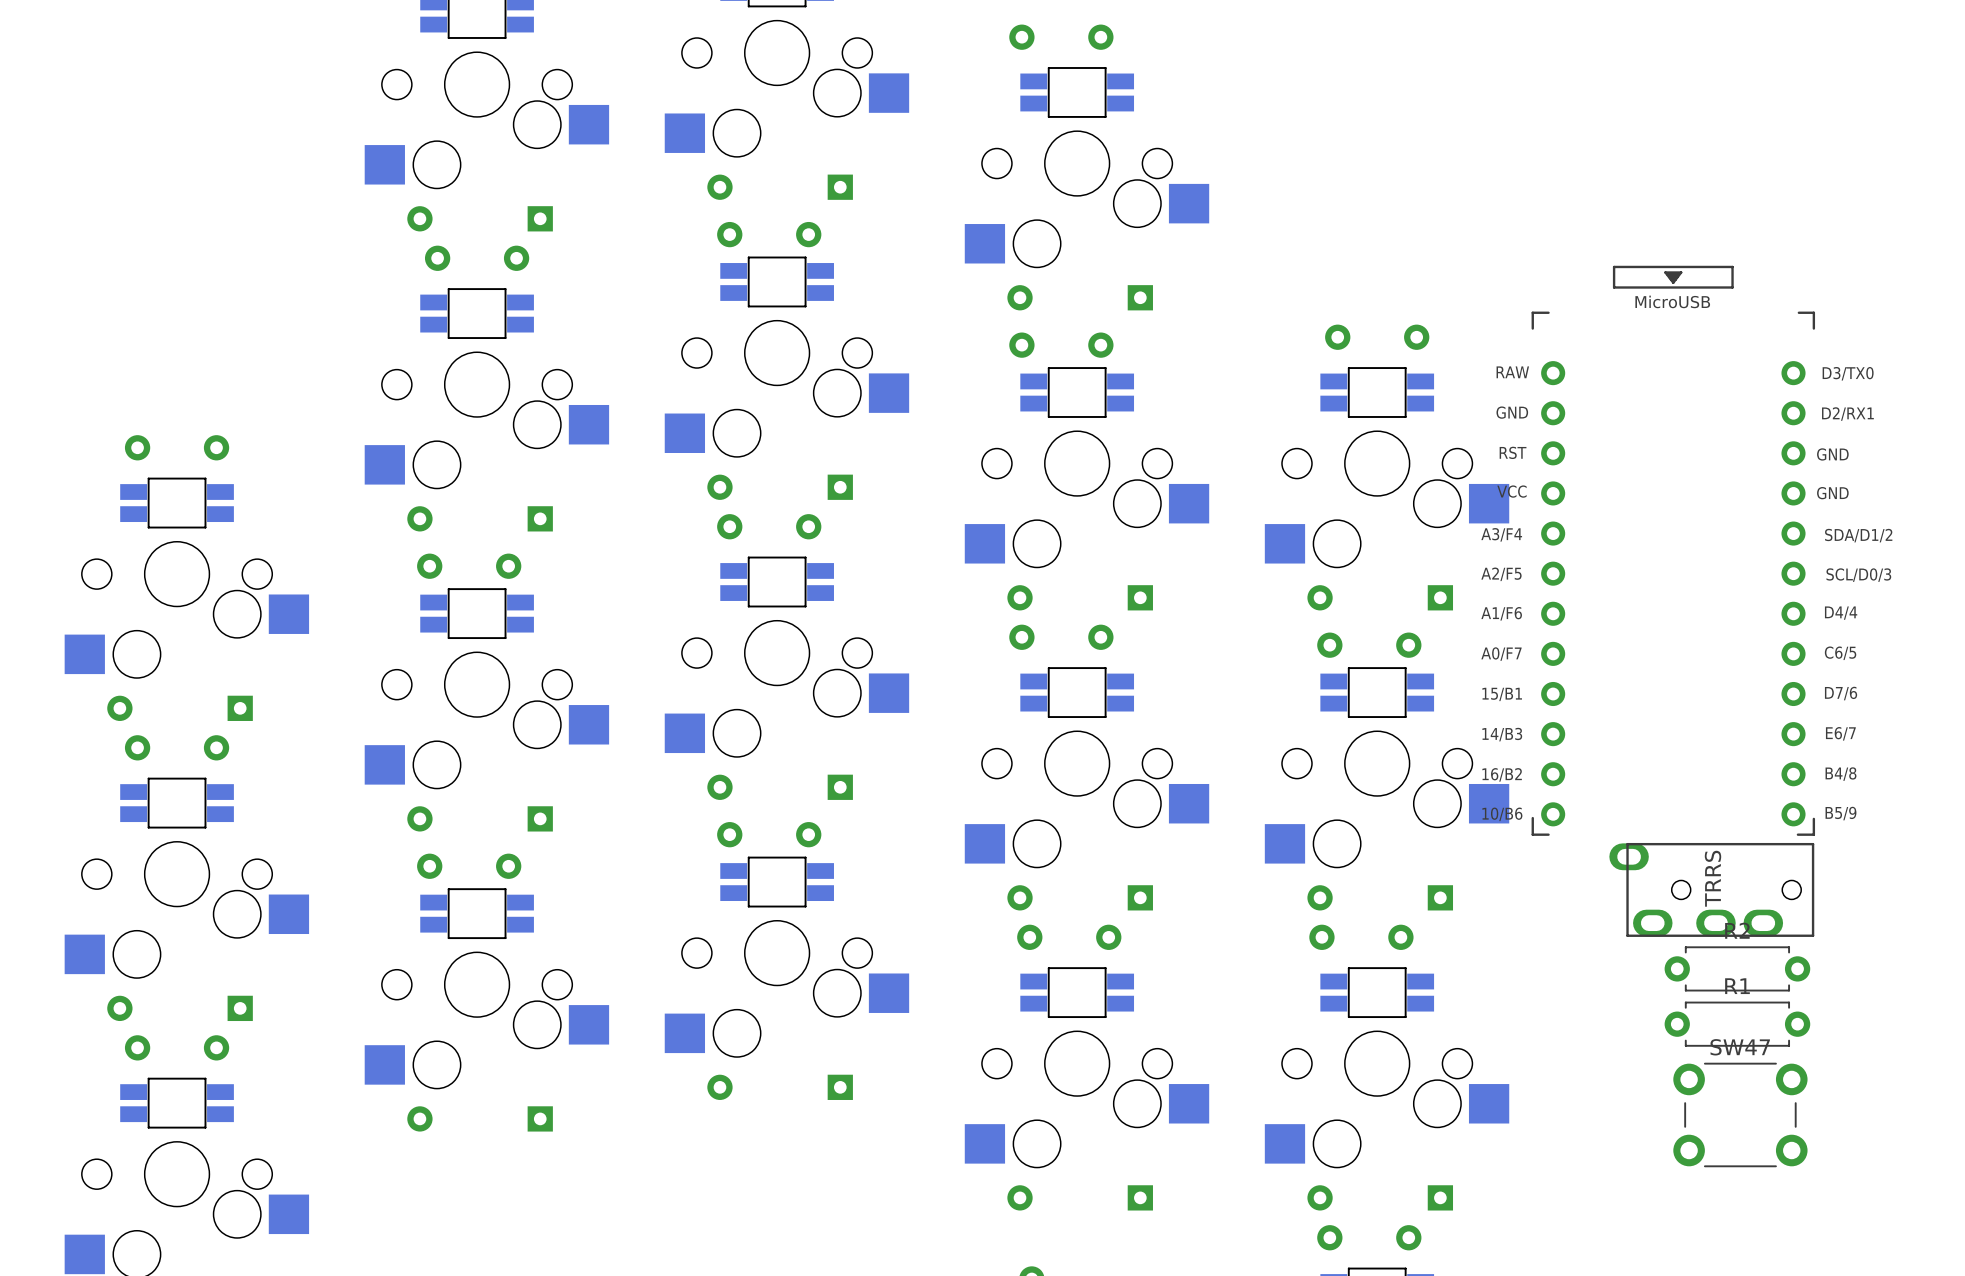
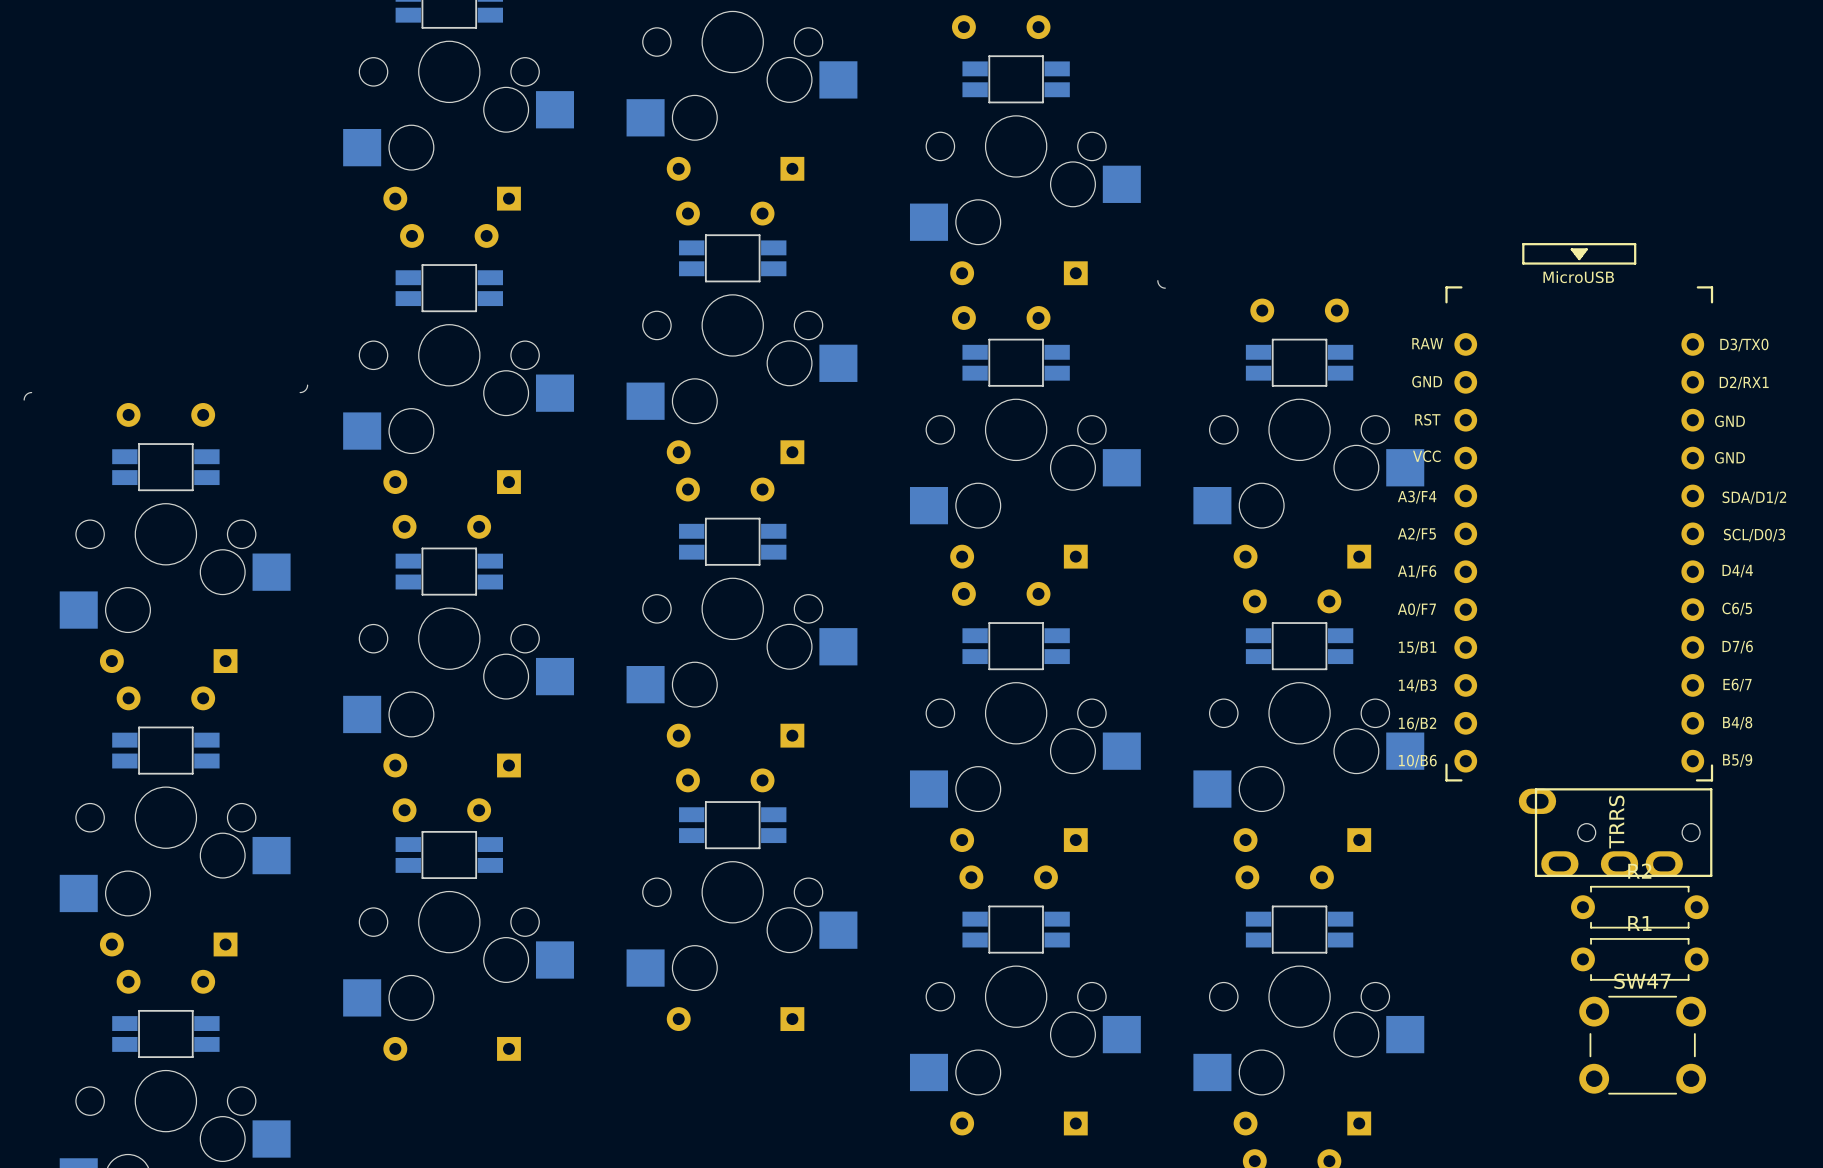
board edge: none -> (1157, 280) (1160, 285) (1165, 288)
board edge: none -> (307, 385) (305, 390) (300, 392)
board edge: none -> (31, 392) (26, 394) (24, 400)

